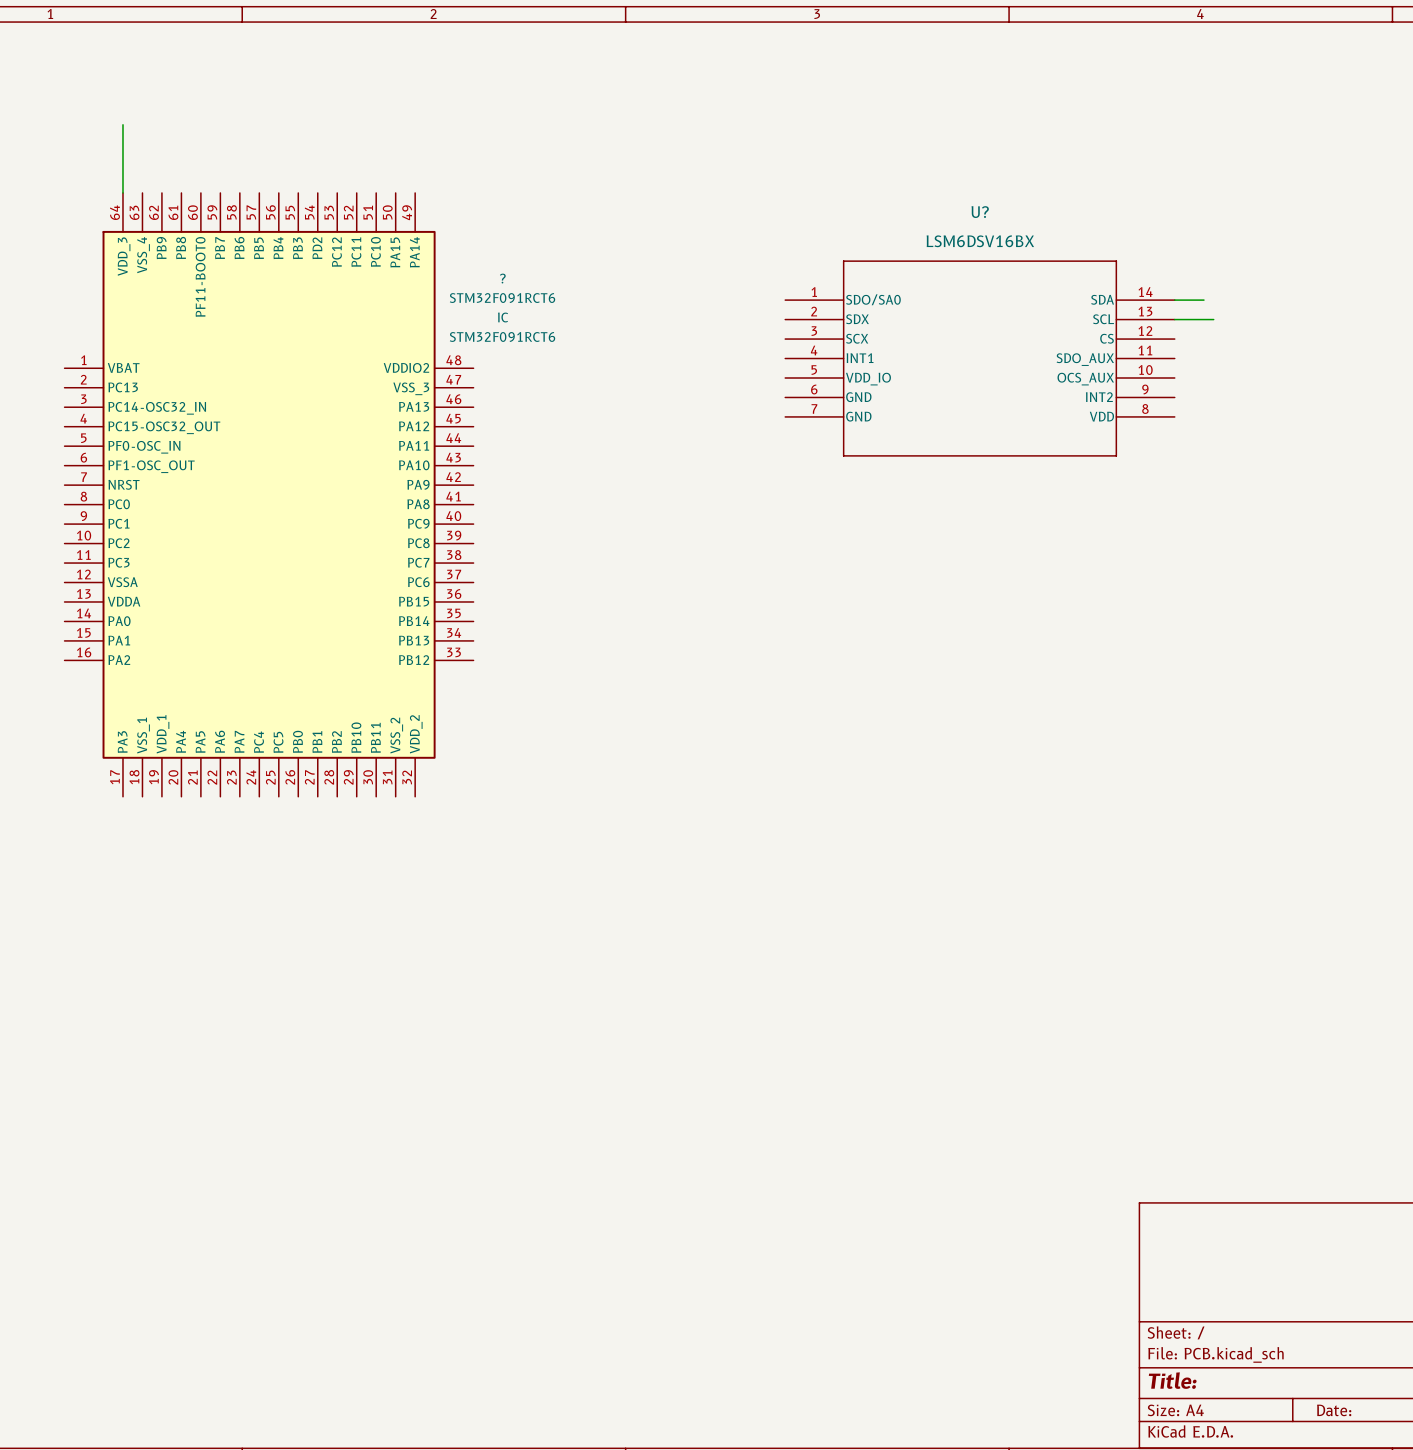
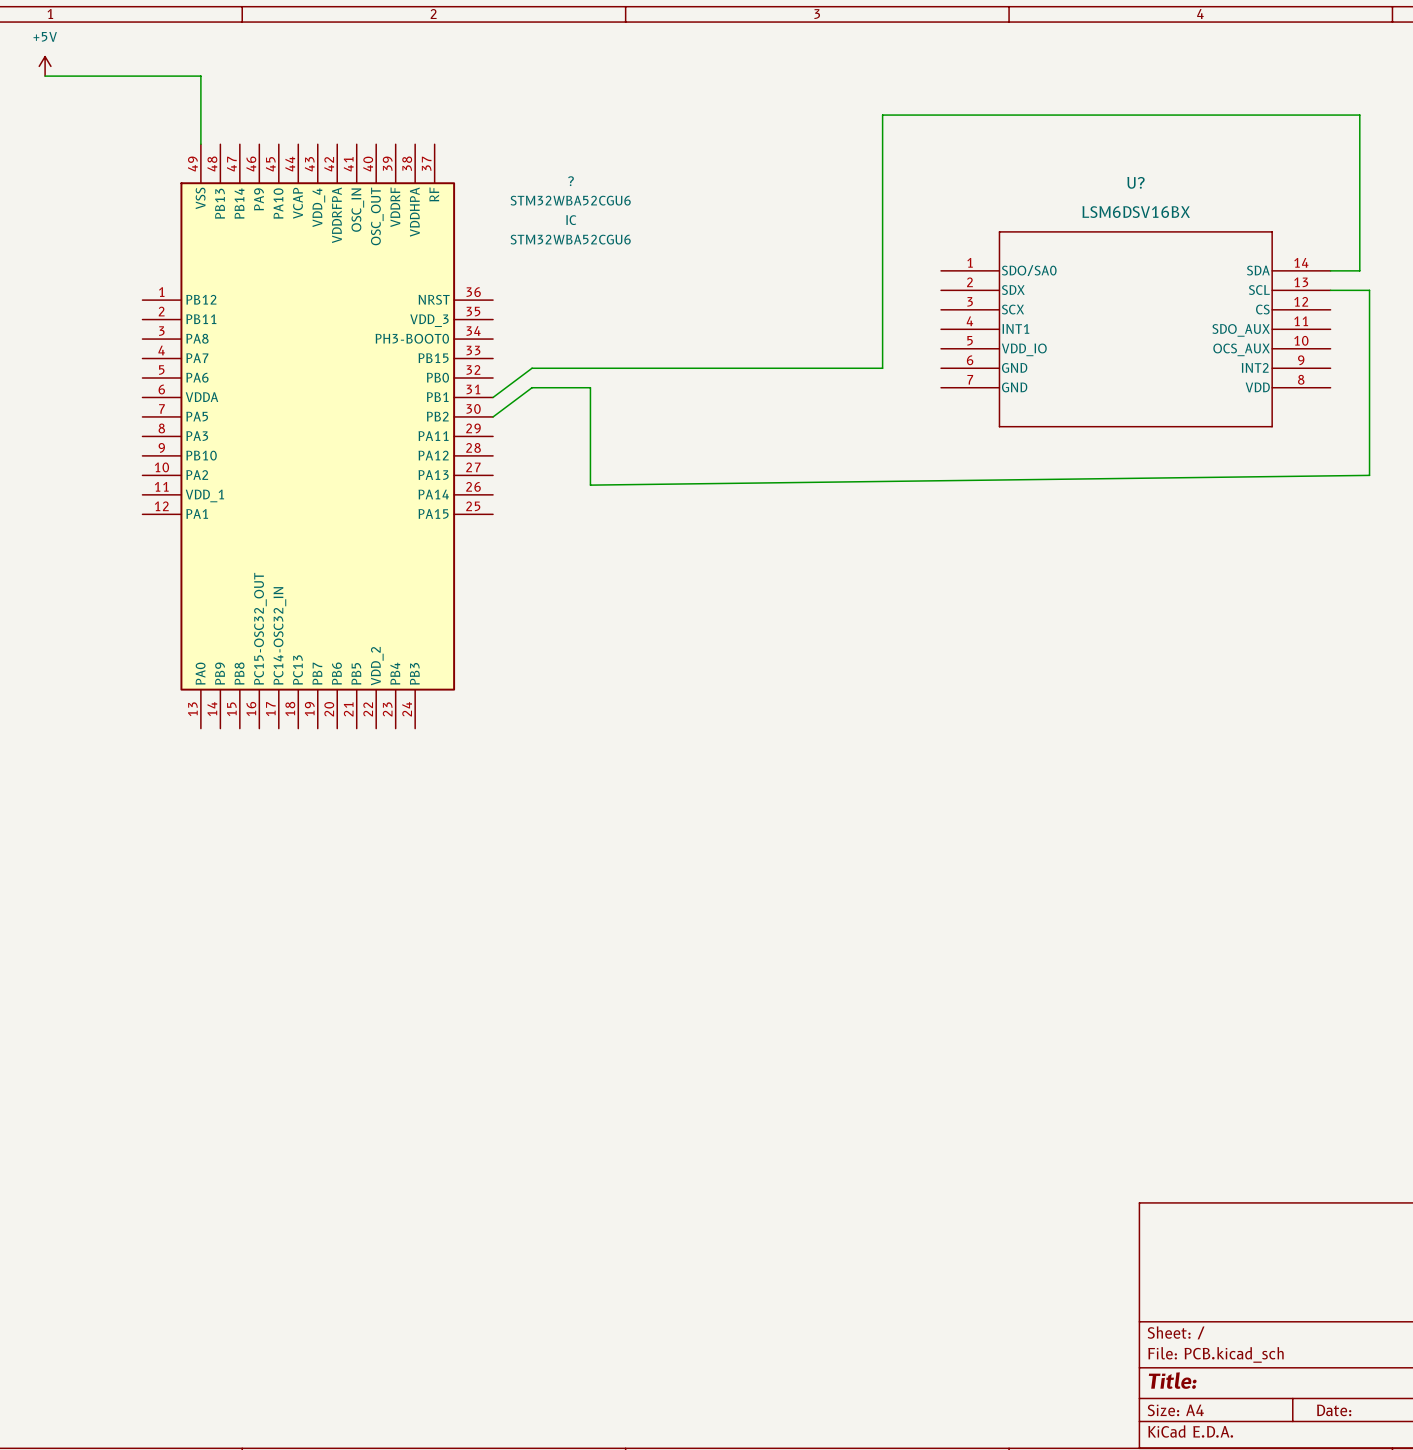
power symbol: none -> +5V (45, 66)
wire: none -> (45, 76) (200, 76) (200, 144)
wire: (122, 124) (122, 192) -> none
wire: none -> (1330, 270) (1359, 270) (1359, 115) (882, 115) (882, 368) (532, 368) (493, 397)
wire: none -> (1330, 290) (1369, 290) (1369, 475) (590, 485) (590, 387) (532, 387) (493, 416)
wire: (1174, 300) (1203, 300) -> none
wire: (1174, 319) (1213, 319) -> none
U? position: (979, 358) -> (1135, 329)
part: none -> STM32WBA52CGU6 (317, 436)
part: STM32F091RCT6 (269, 494) -> none

